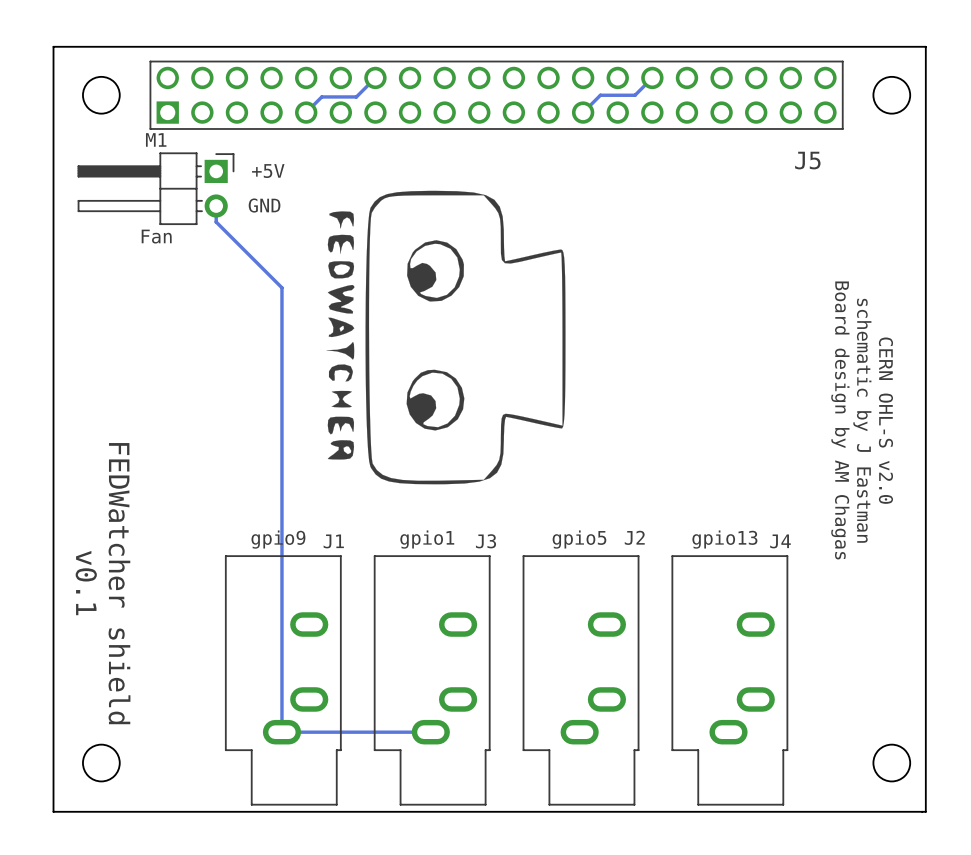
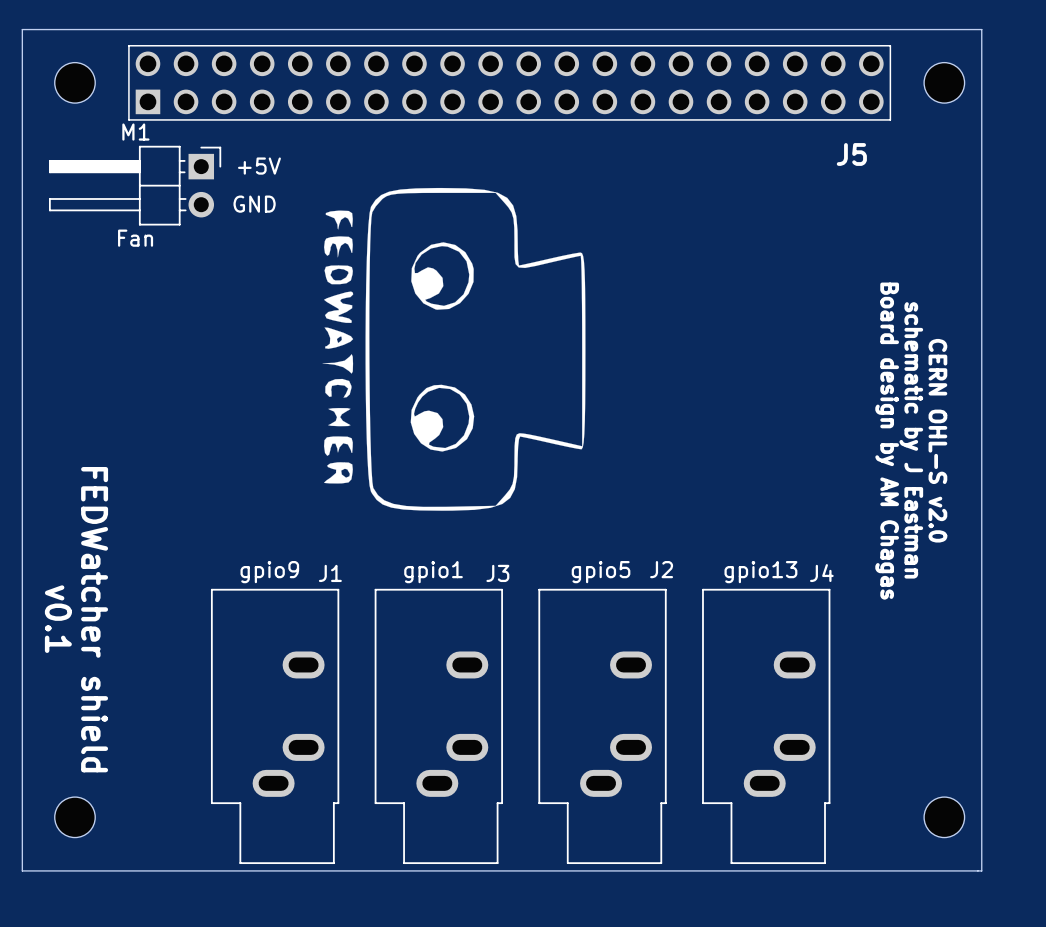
track: (375, 77) (356, 96) (321, 96) (306, 112) -> none
track: (652, 77) (635, 95) (600, 95) (583, 112) -> none
track: (216, 206) (216, 222) (281, 287) (281, 732) (430, 732) -> none

